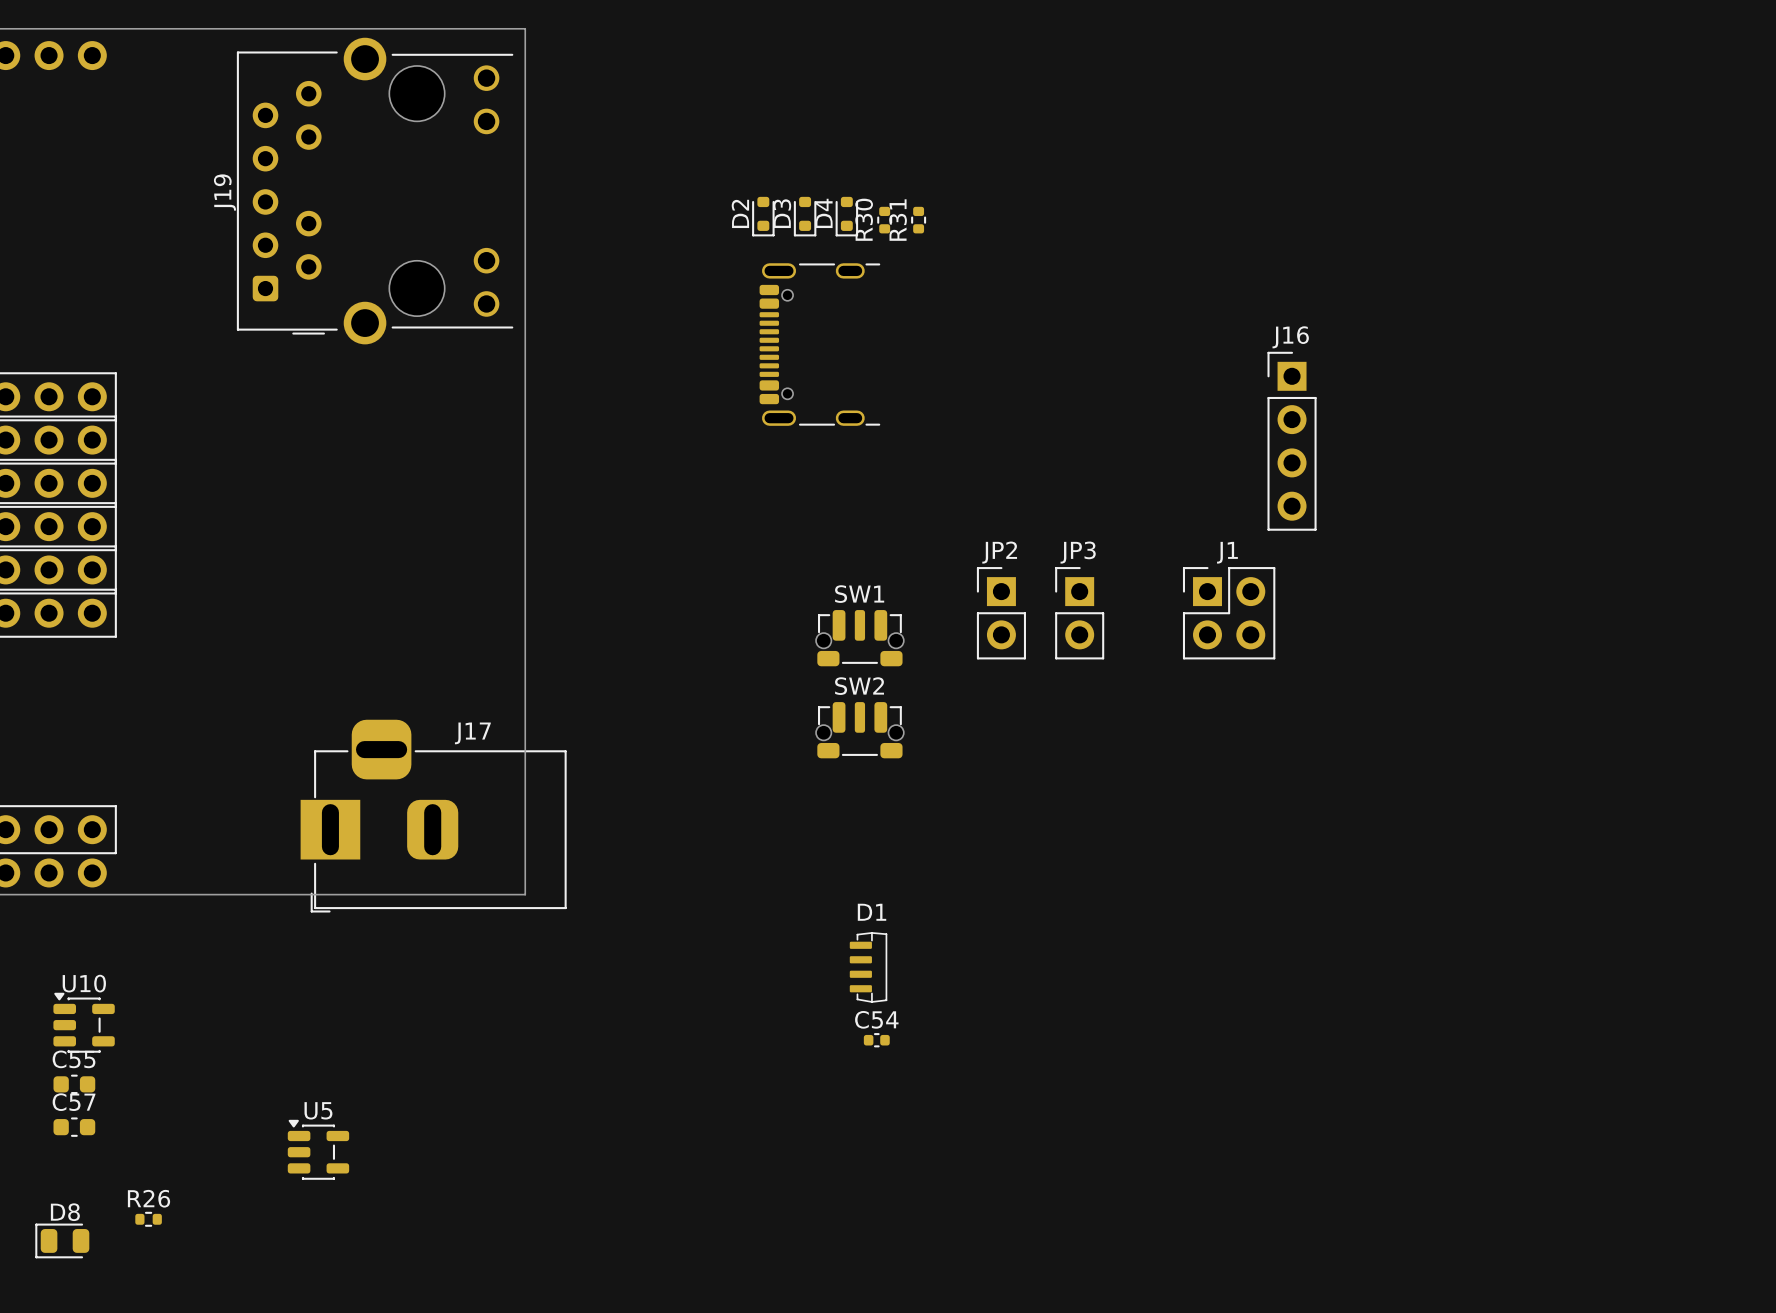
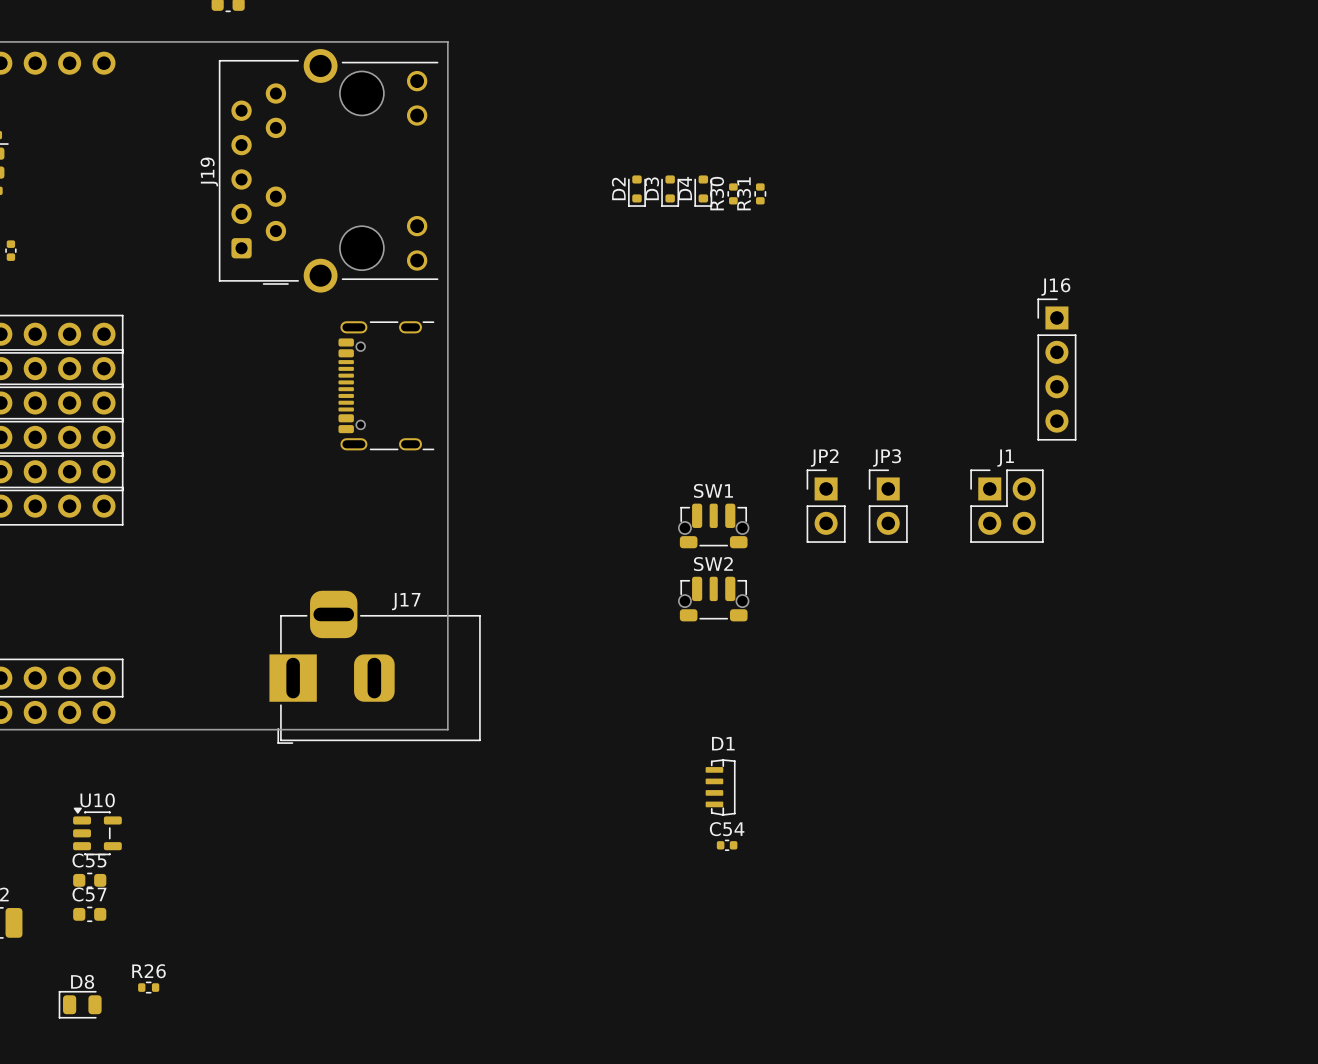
part position: (819, 344) -> (386, 385)
U5: (318, 1149) -> none

